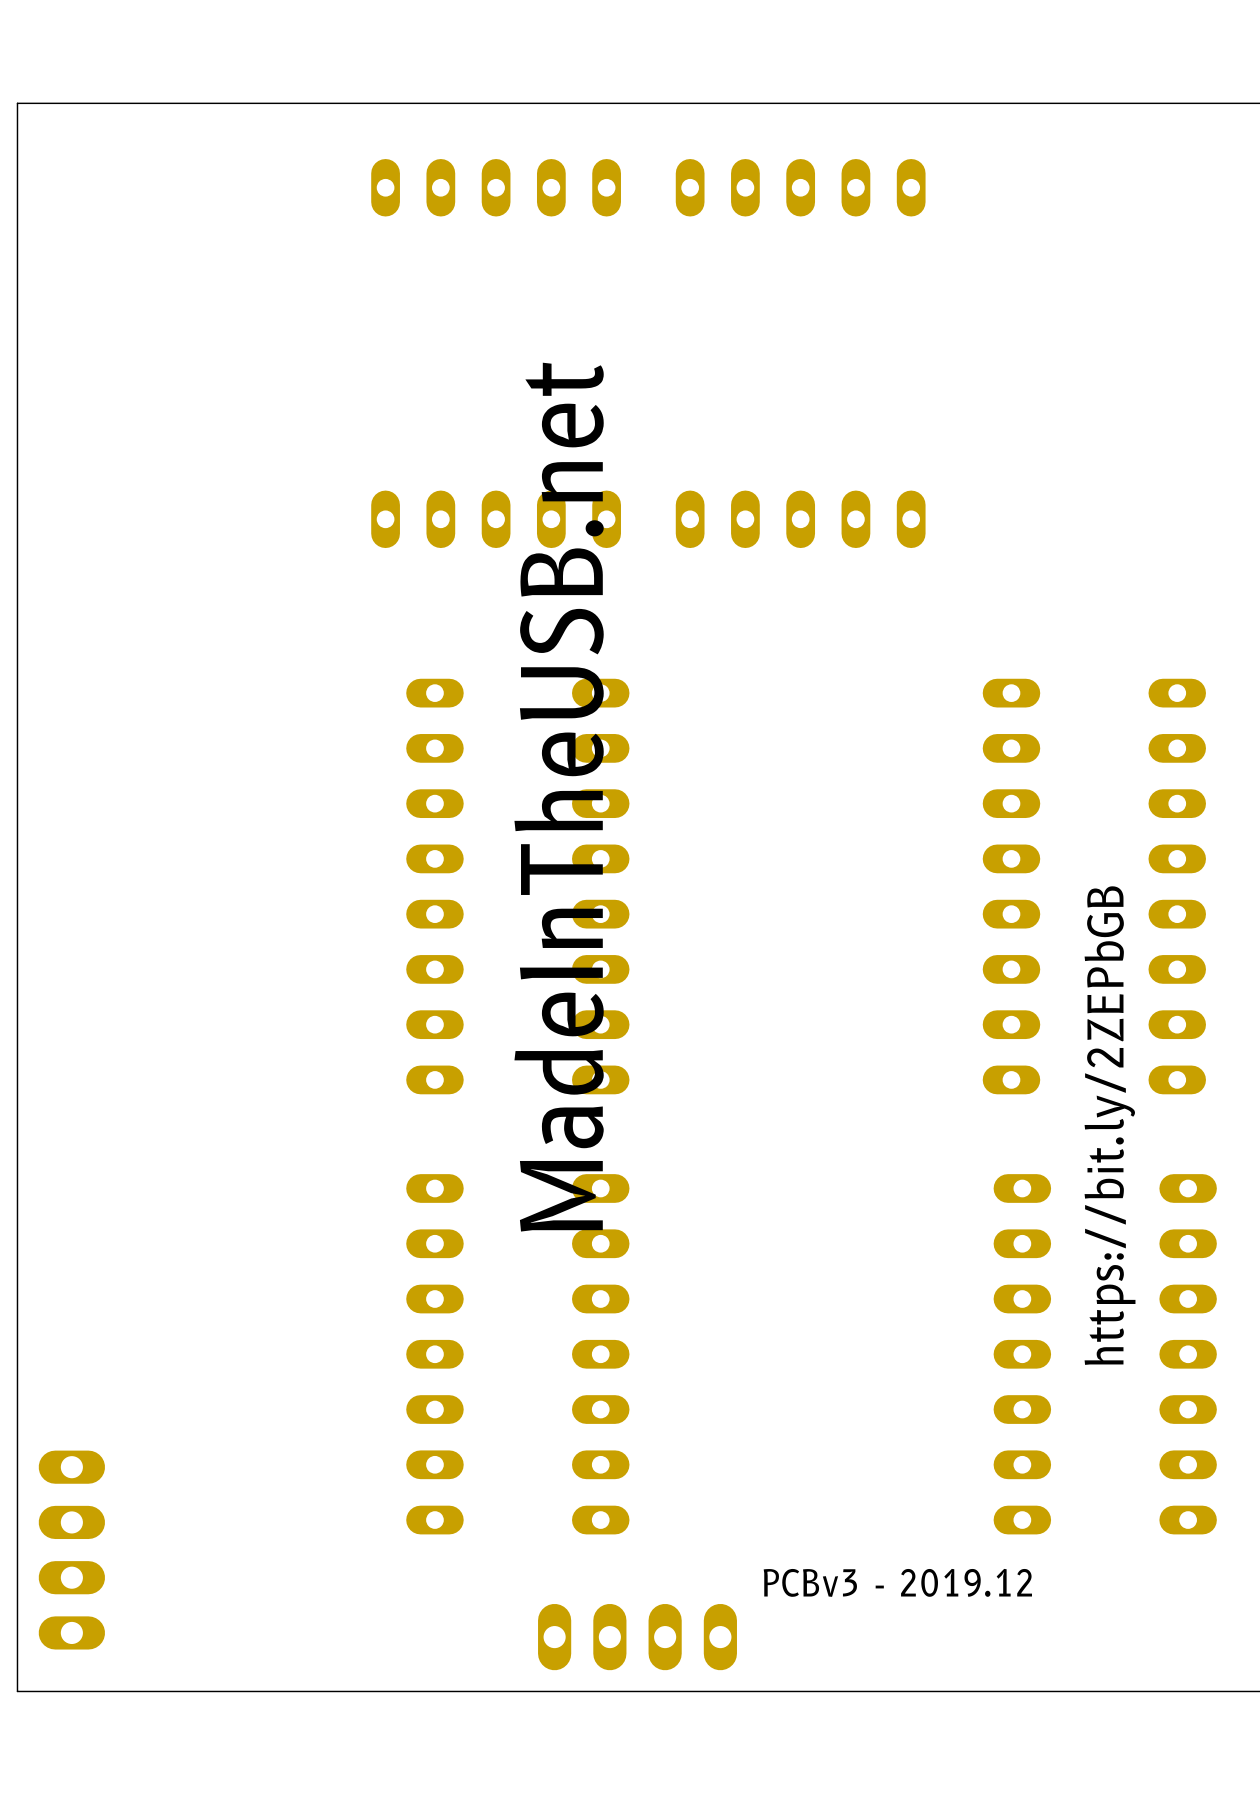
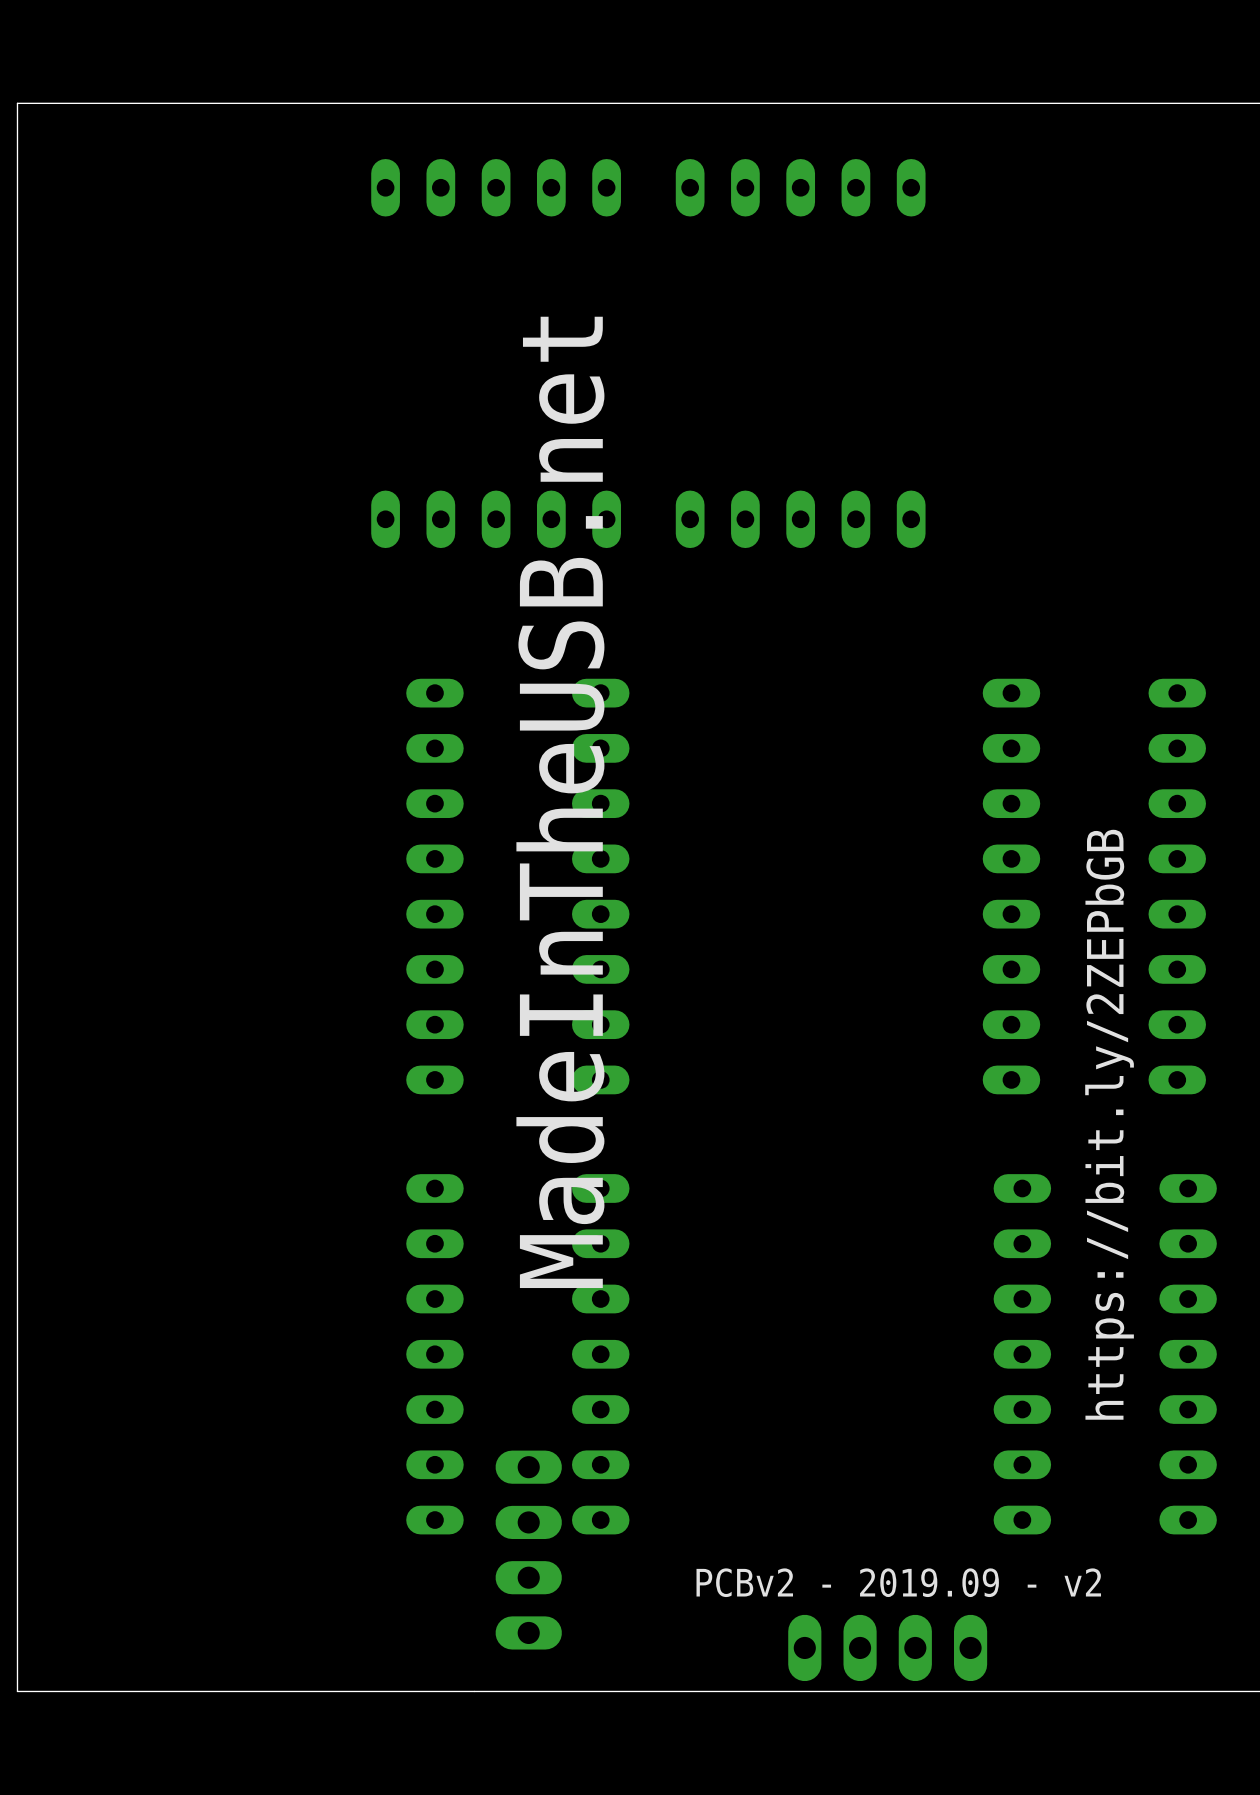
part: (71, 1550) -> none
part: none -> (528, 1550)
text: PCBv3 - 2019.12 (897, 1582) -> PCBv2 - 2019.09 - v2 (898, 1582)
part: (637, 1637) -> none
part: none -> (887, 1647)

